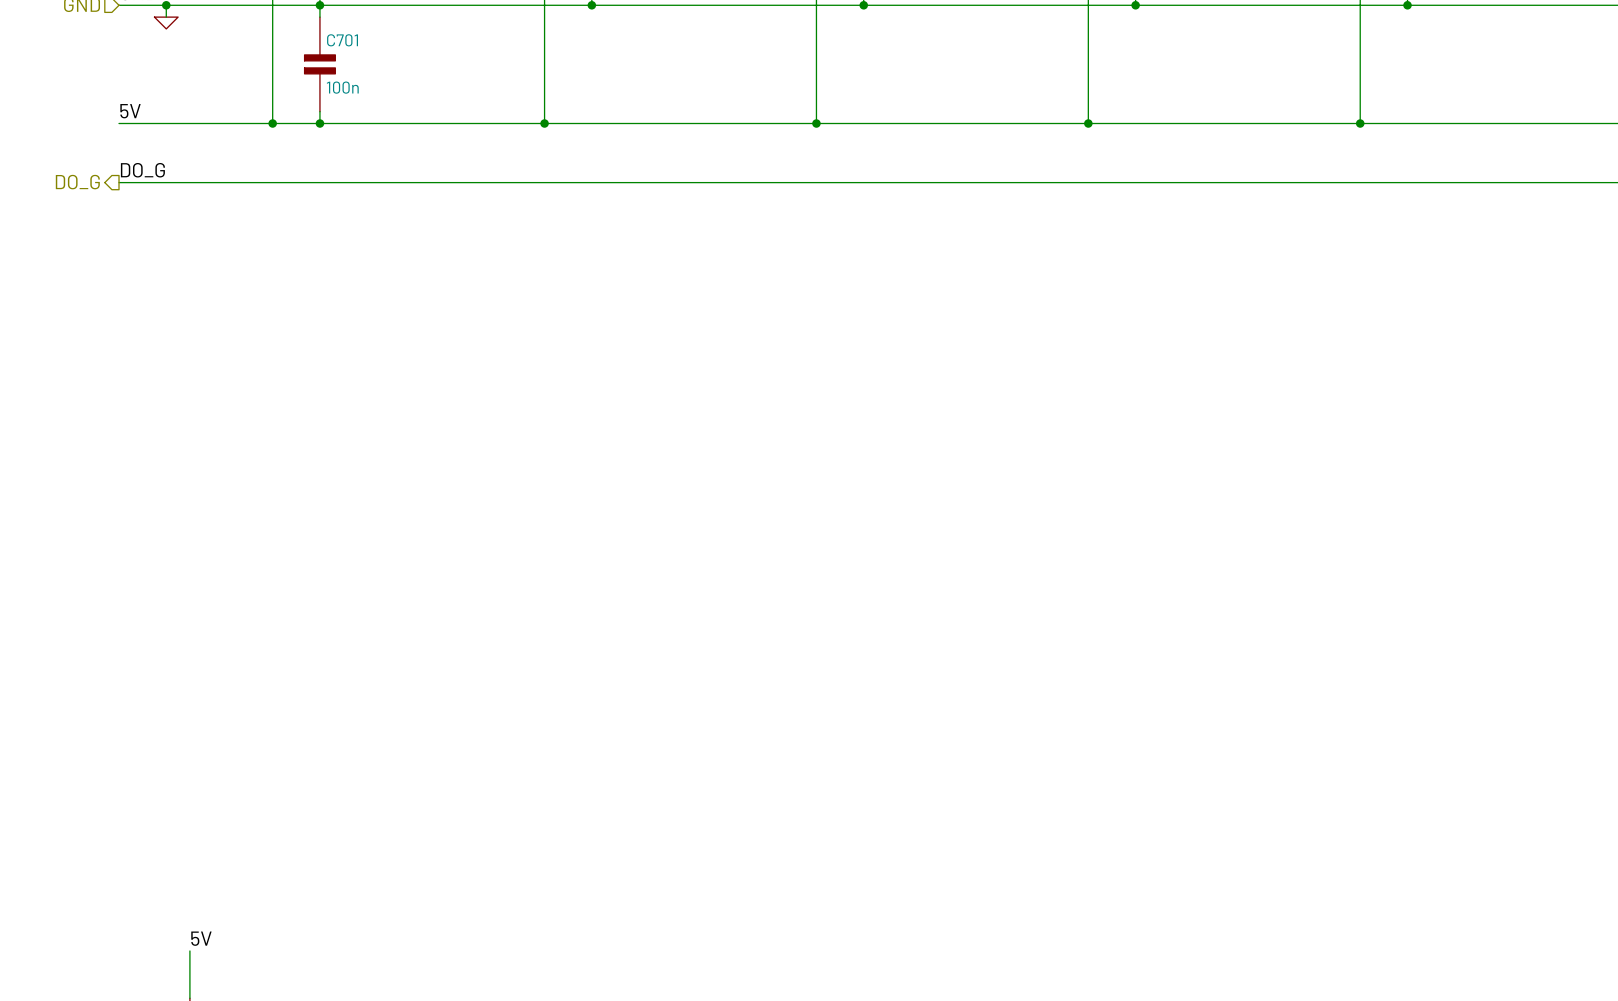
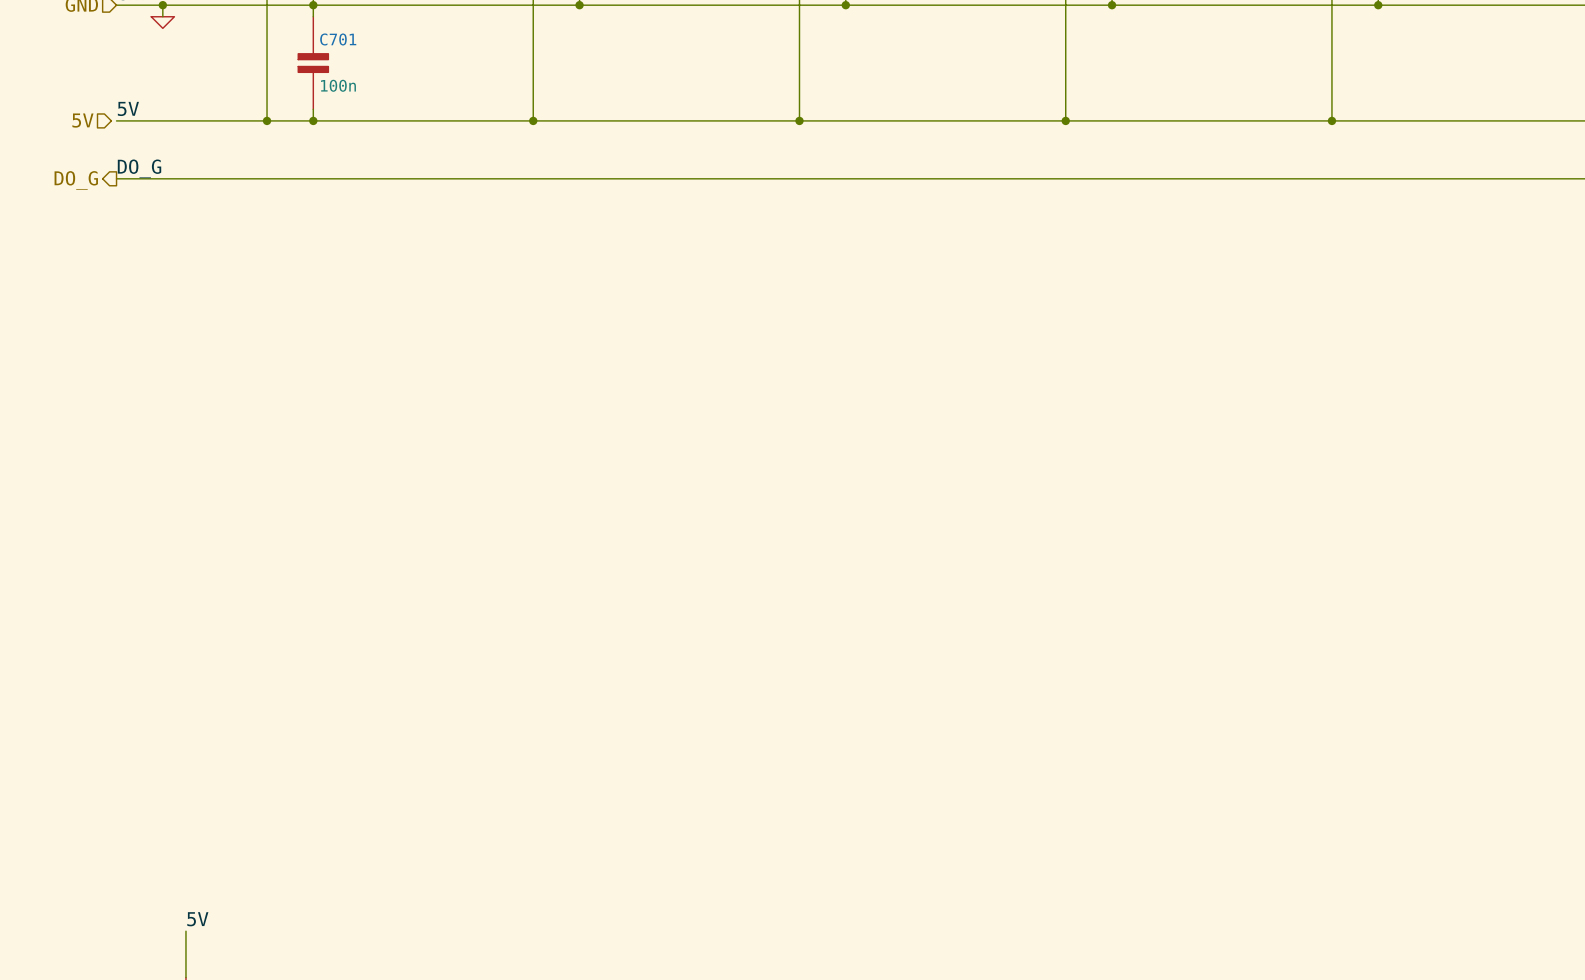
hierarchical label: none -> 5V (82, 120)

